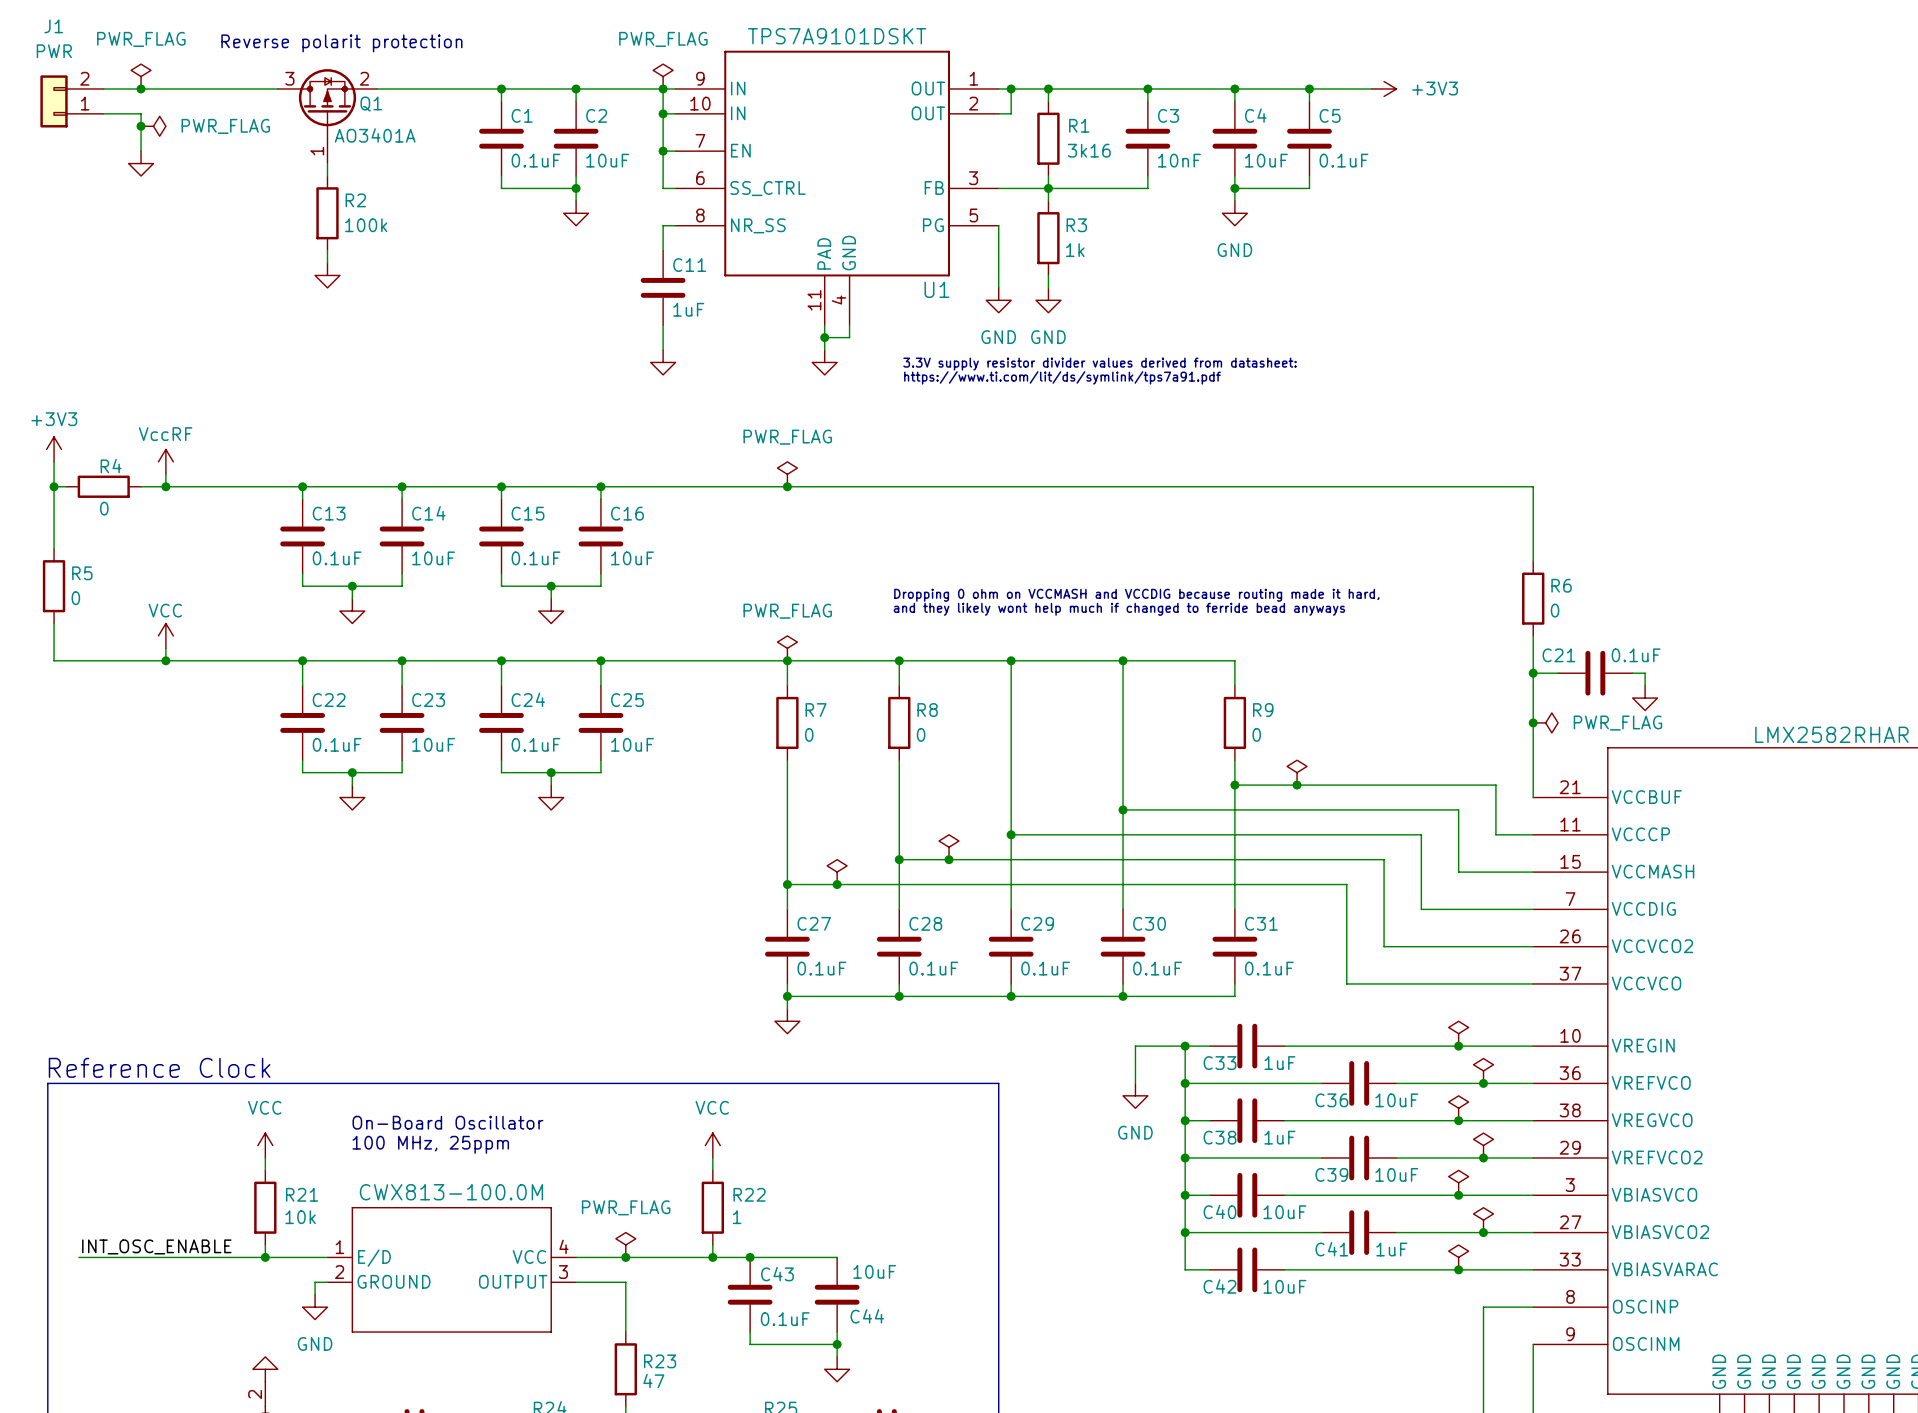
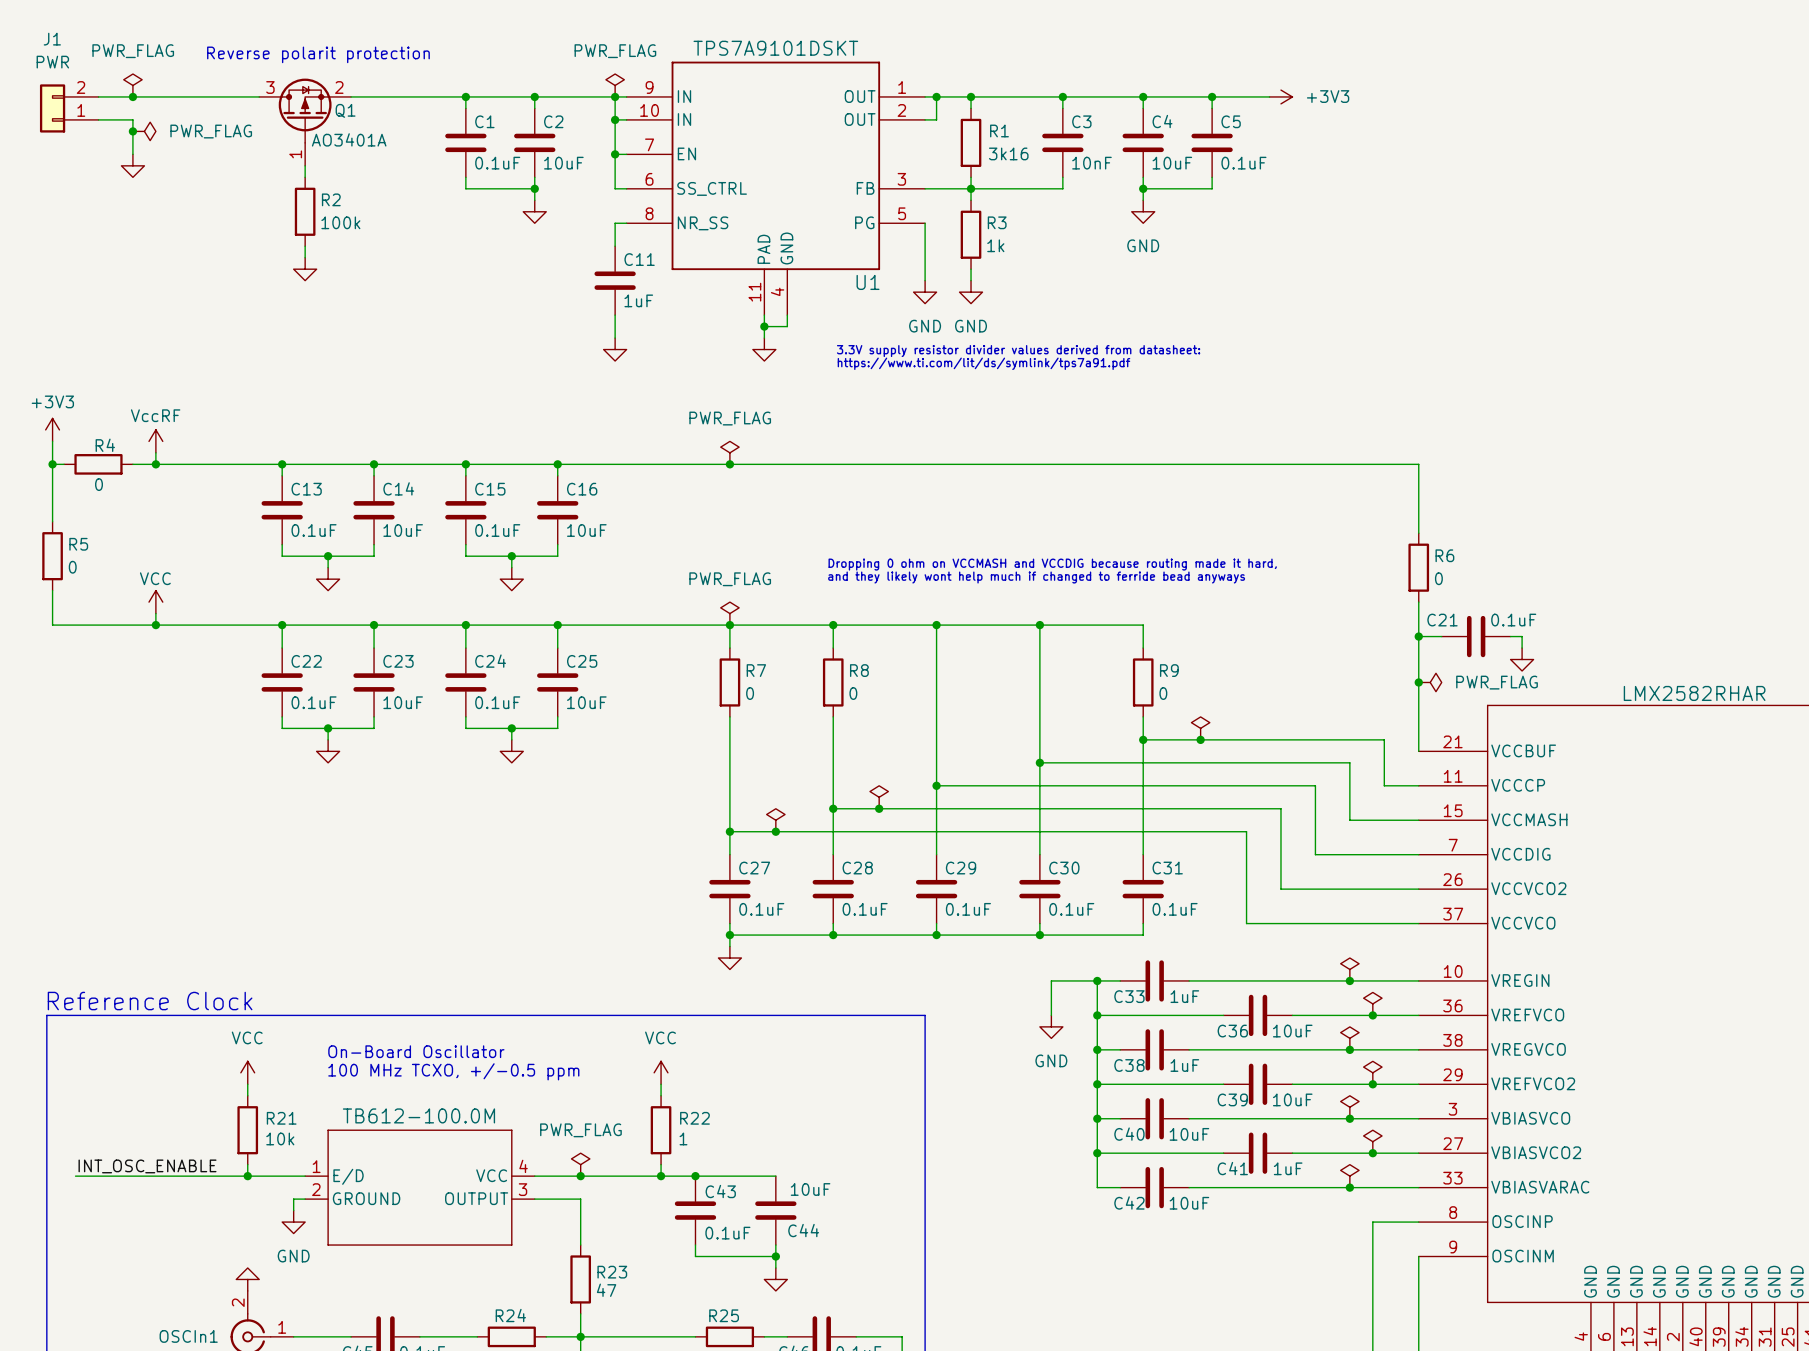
text: 100 MHz, 25ppm (430, 1144) -> 100 MHz TCXO, +/-0.5 ppm (453, 1071)
part value: CWX813-100.0M (451, 1192) -> TB612-100.0M (418, 1115)

